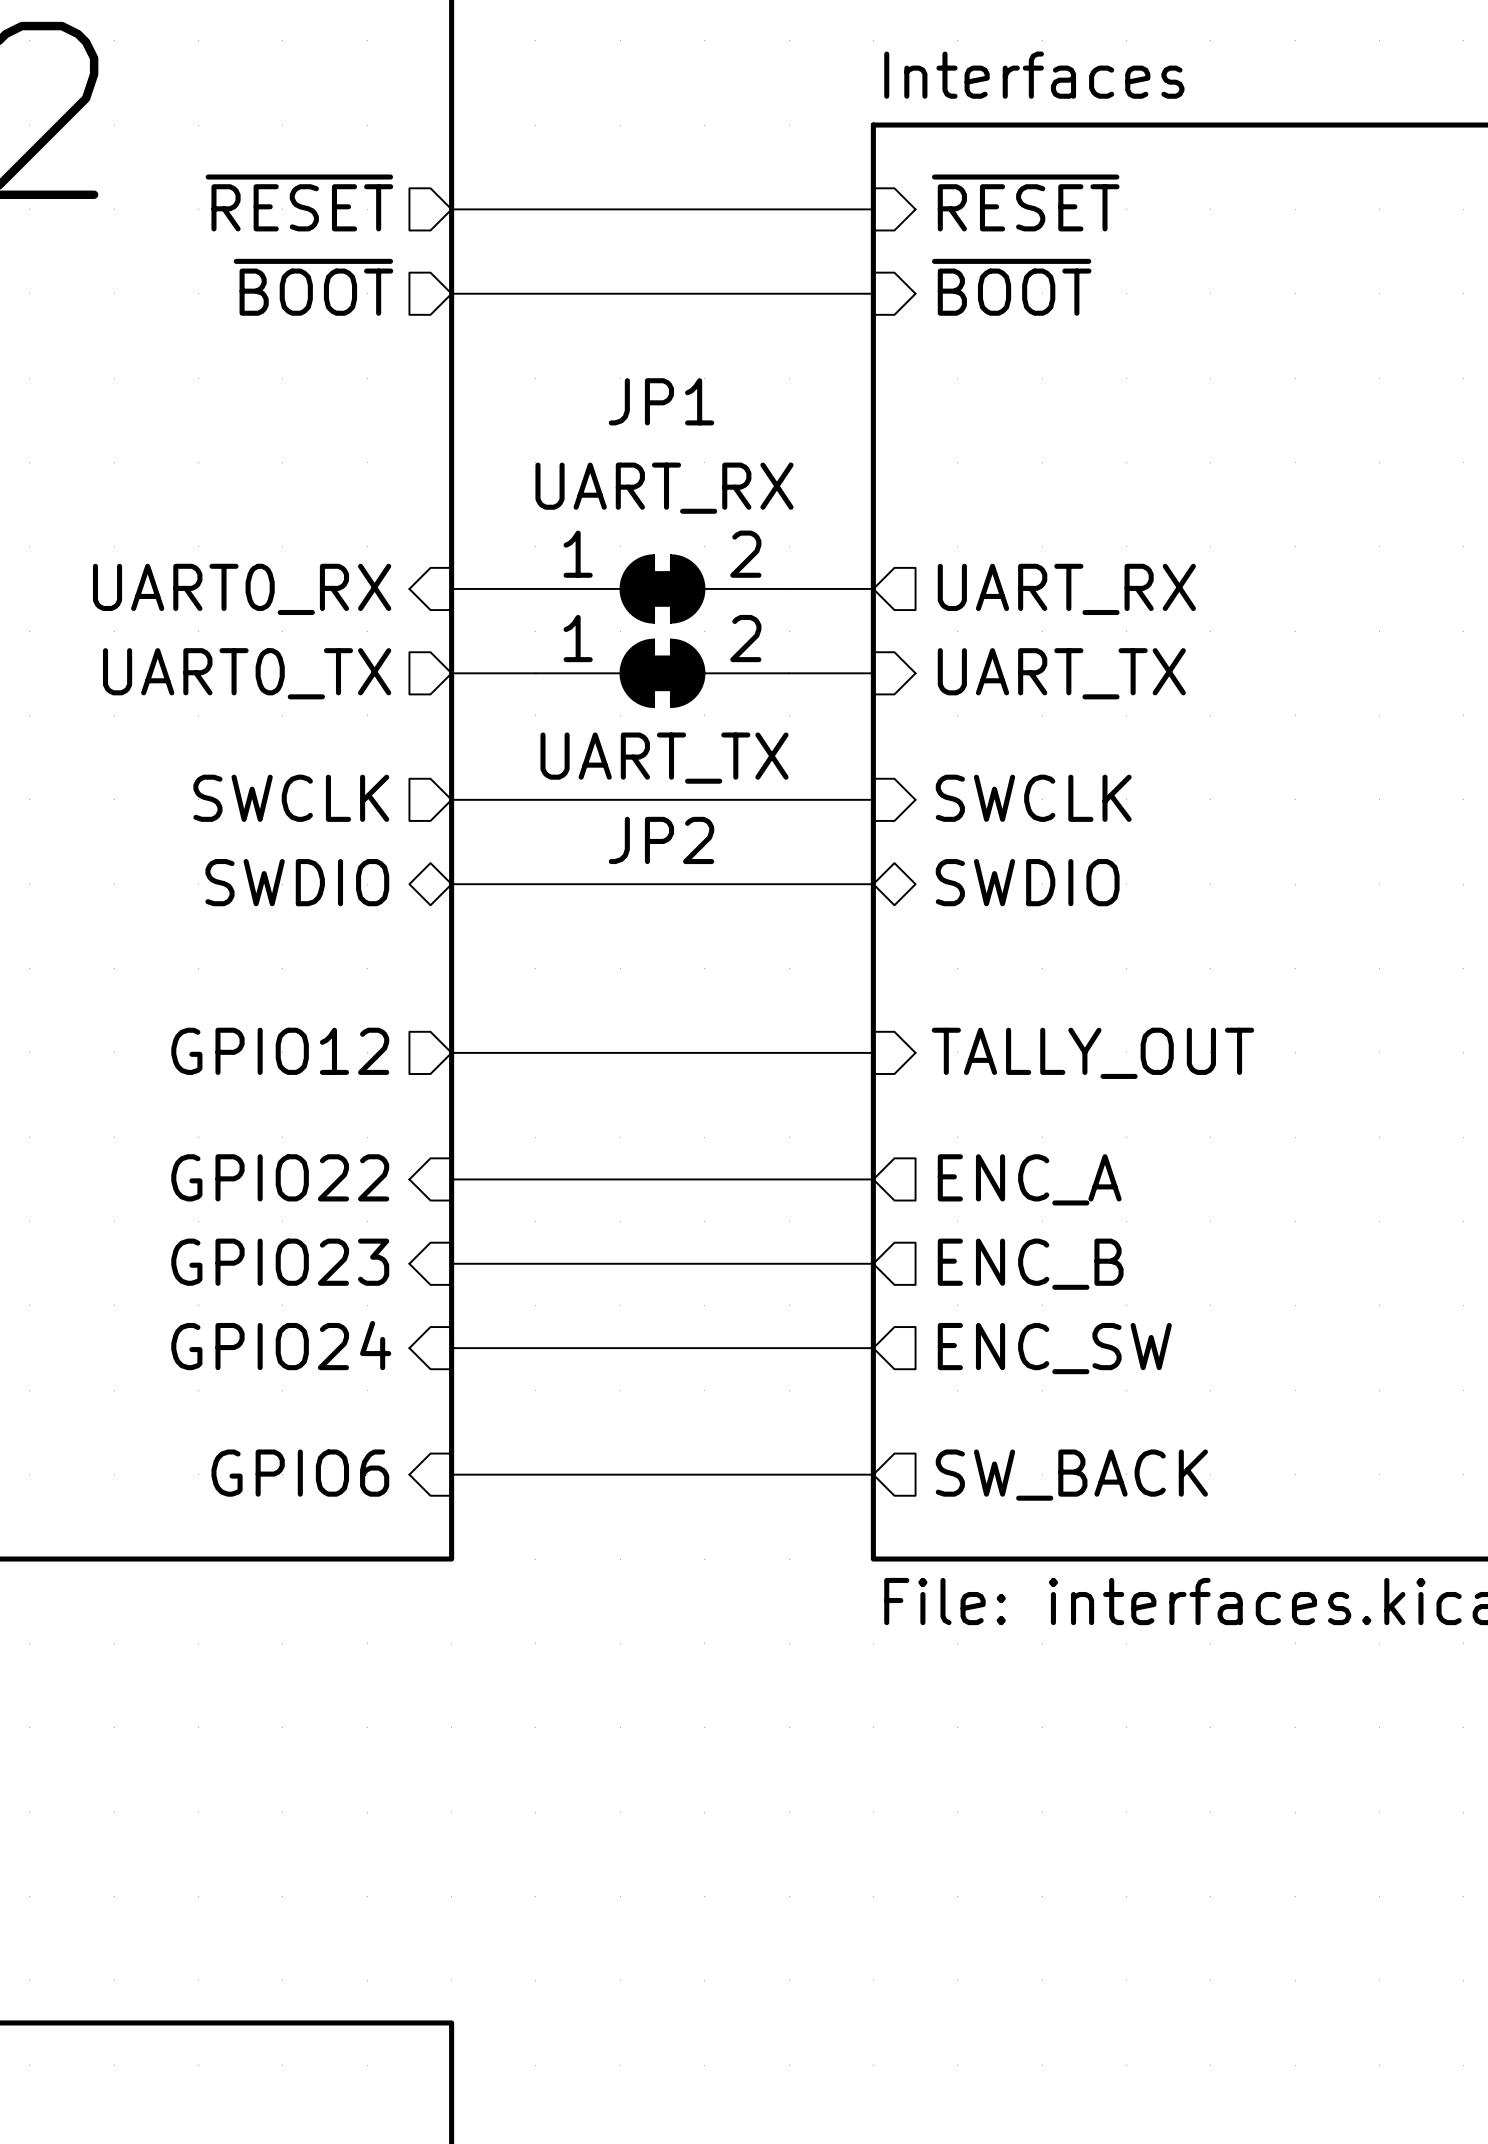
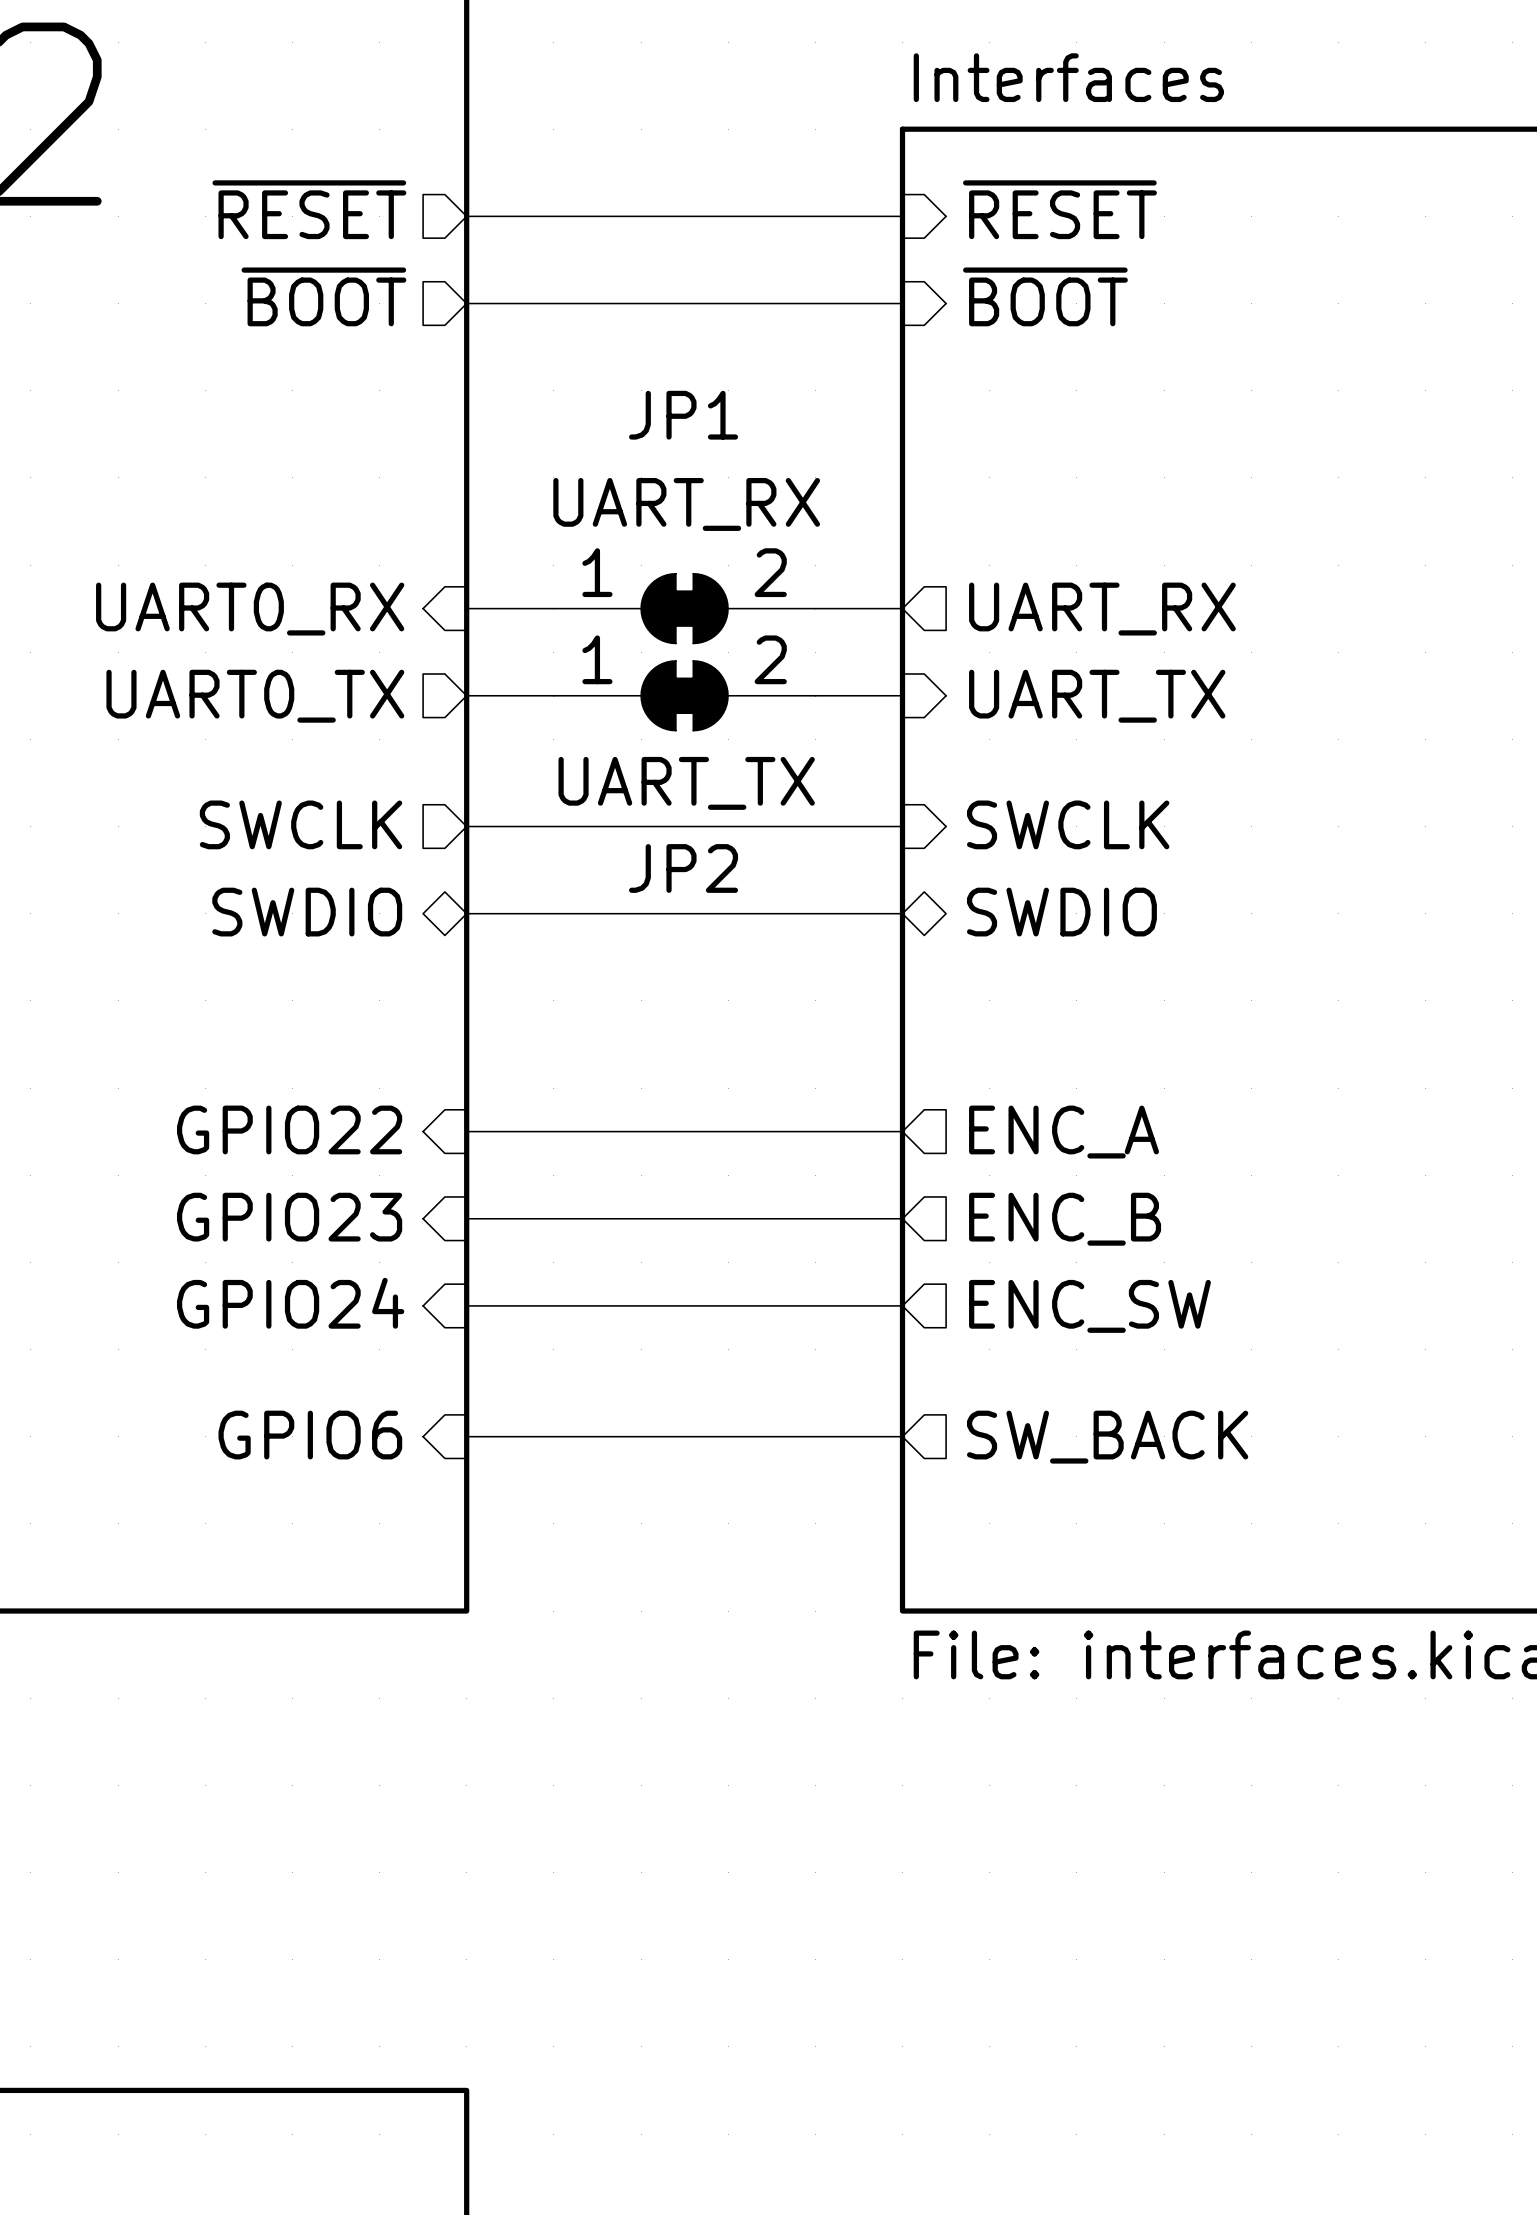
sheet pin shape: output (280, 1051) -> input (289, 1129)
sheet pin: GPIO12 (280, 1051) -> GPIO22 (289, 1129)
wire: (451, 1052) (873, 1052) -> (466, 1131) (902, 1131)
sheet pin: TALLY_OUT (1092, 1053) -> none
sheet pin: none -> ENC_A (1064, 1132)
sheet pin: GPIO22 (280, 1177) -> GPIO23 (289, 1217)
sheet pin: ENC_A (1029, 1179) -> ENC_B (1065, 1219)
sheet pin: GPIO23 (280, 1262) -> GPIO24 (290, 1303)
sheet pin: ENC_B (1030, 1264) -> ENC_SW (1089, 1306)
sheet pin: GPIO24 (281, 1345) -> none
wire: (451, 1348) (873, 1348) -> (466, 1436) (902, 1436)
sheet pin: ENC_SW (1054, 1348) -> none
sheet pin position: GPIO6 (300, 1473) -> GPIO6 (310, 1435)
wire: (451, 1474) (873, 1474) -> none
sheet pin position: SW_BACK (1071, 1475) -> SW_BACK (1107, 1437)

